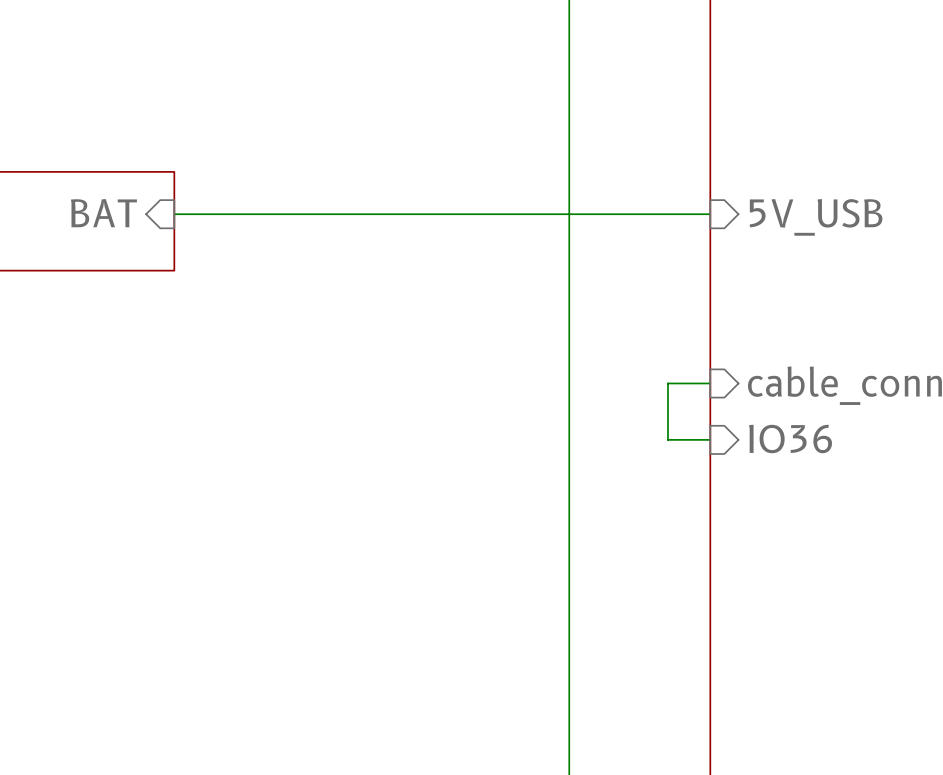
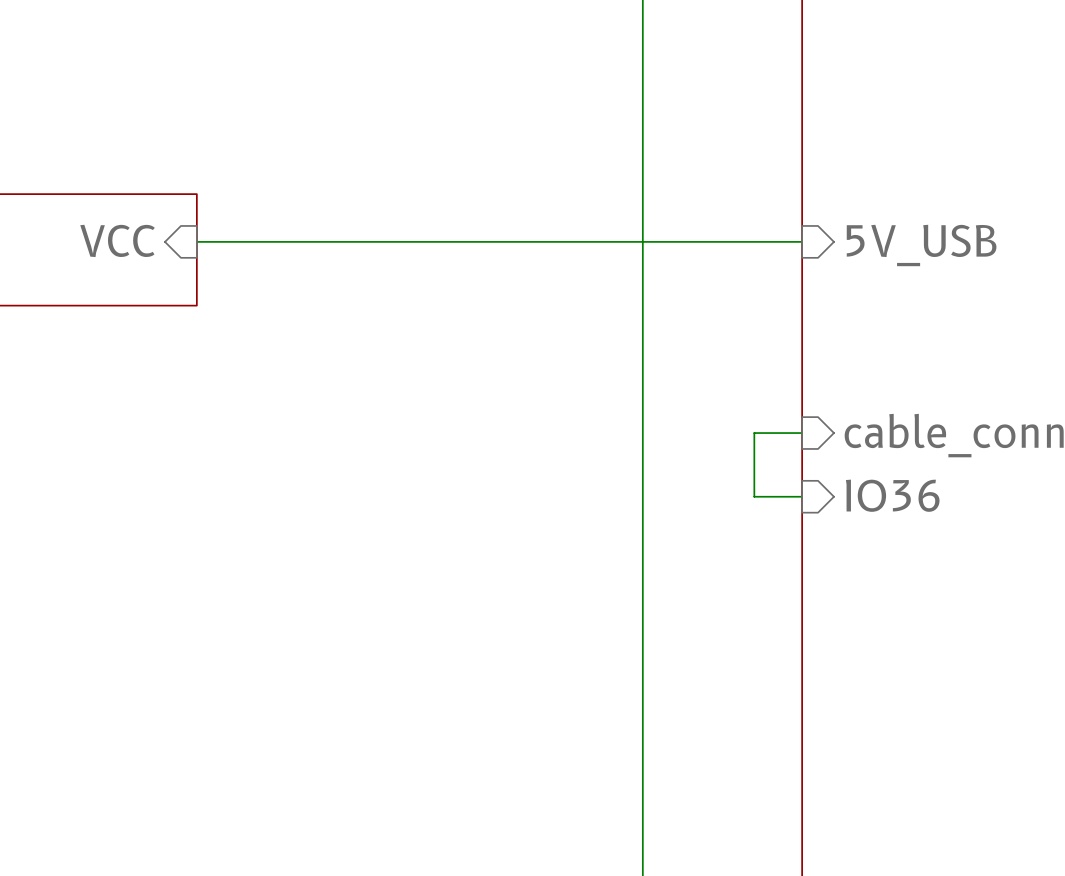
sheet pin: BAT (103, 213) -> VCC (117, 240)

